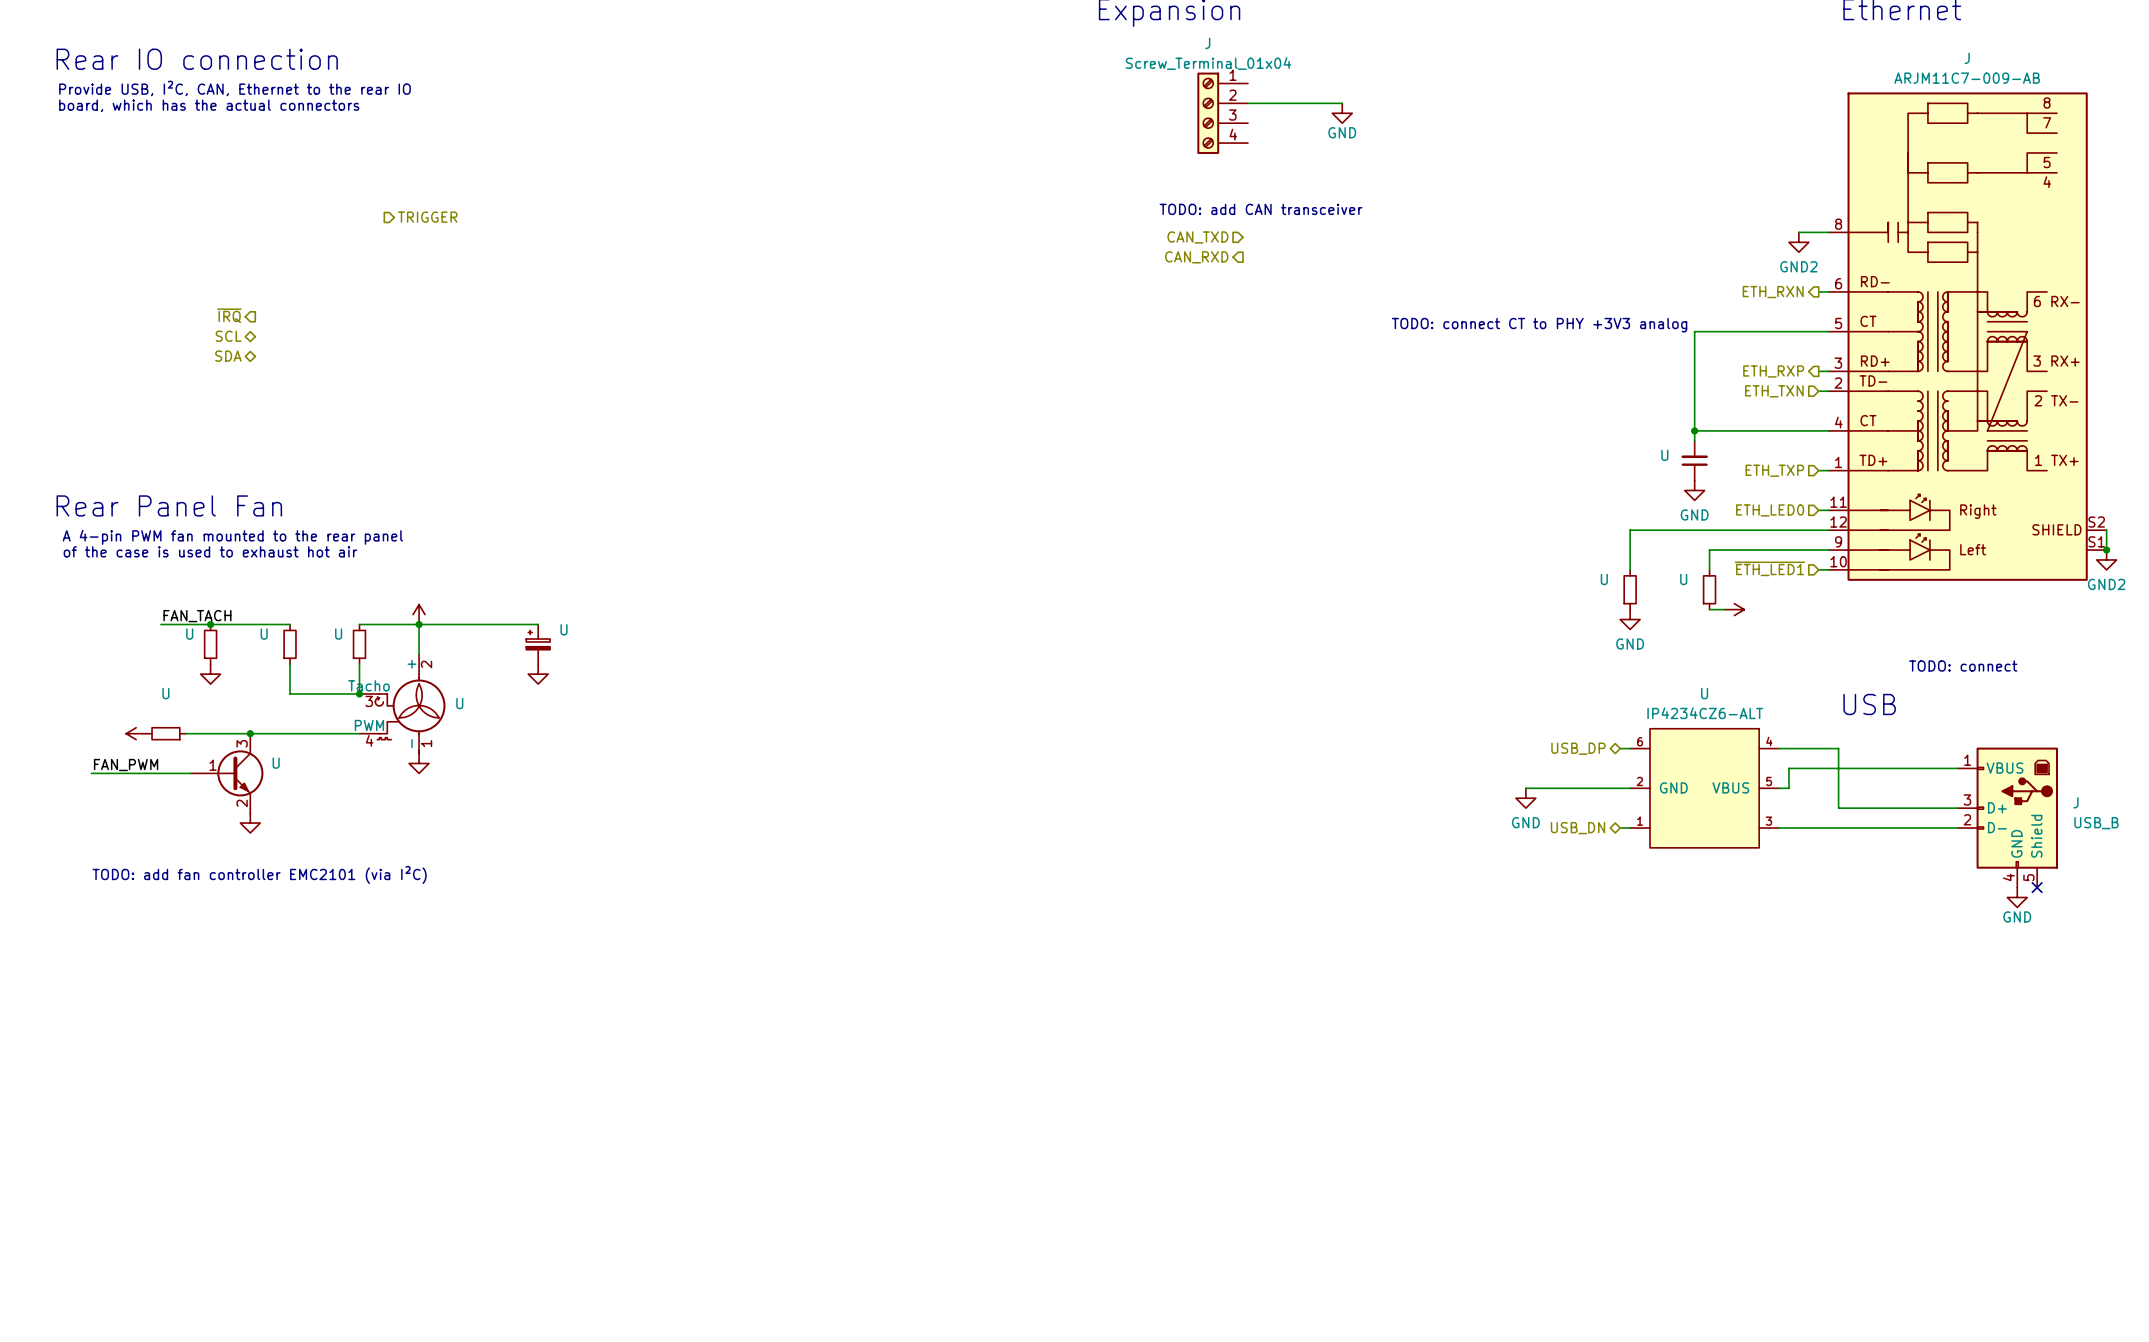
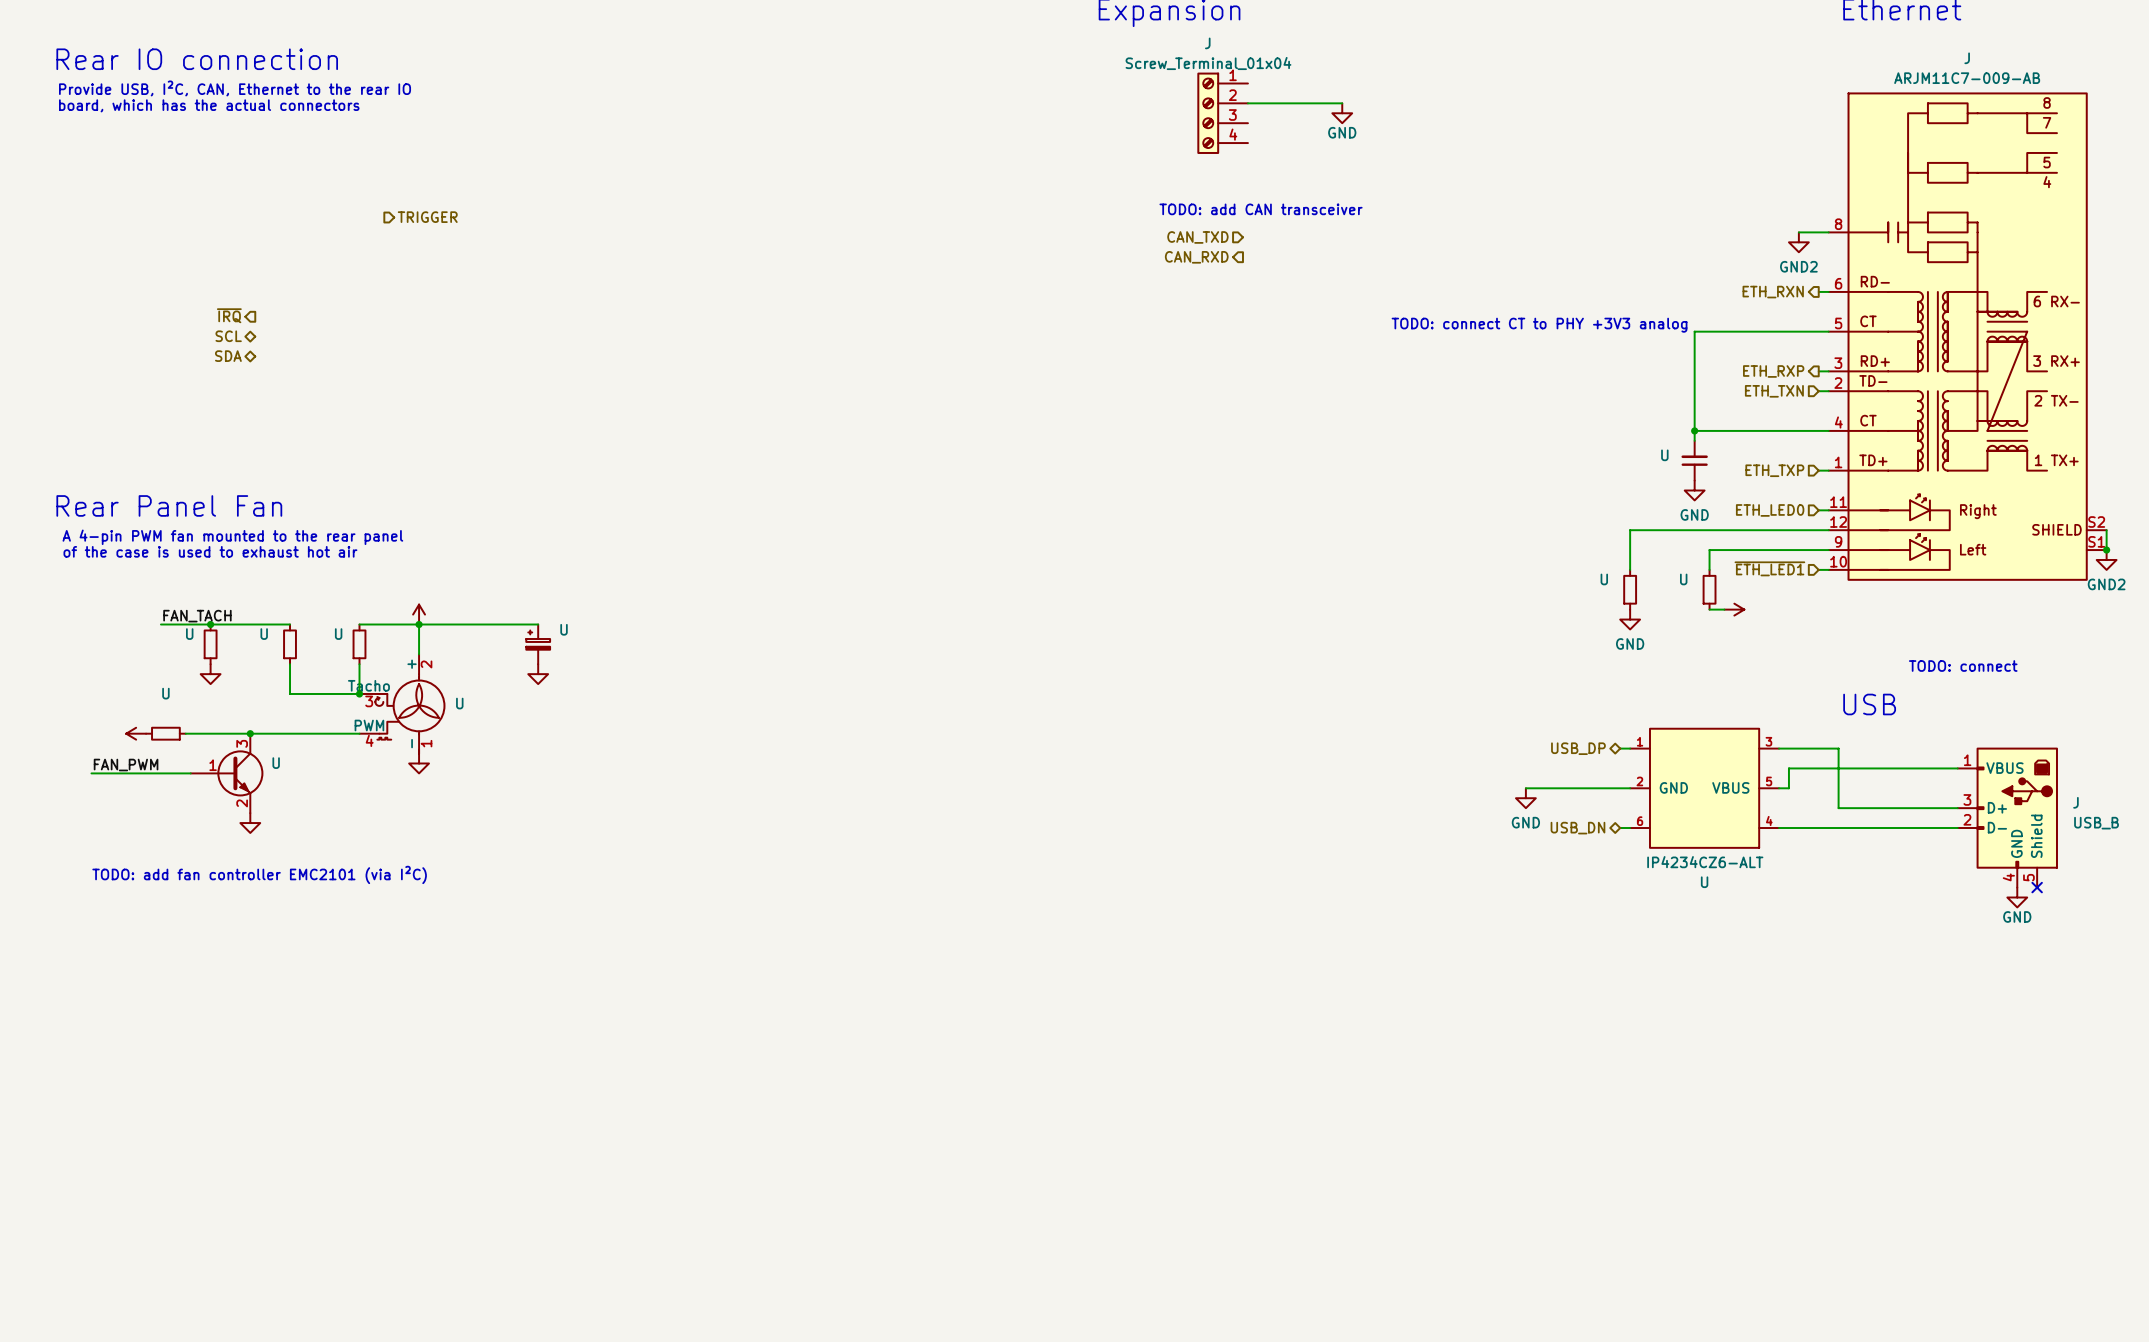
U flip: as is (1704, 788) -> up-down (1704, 788)

